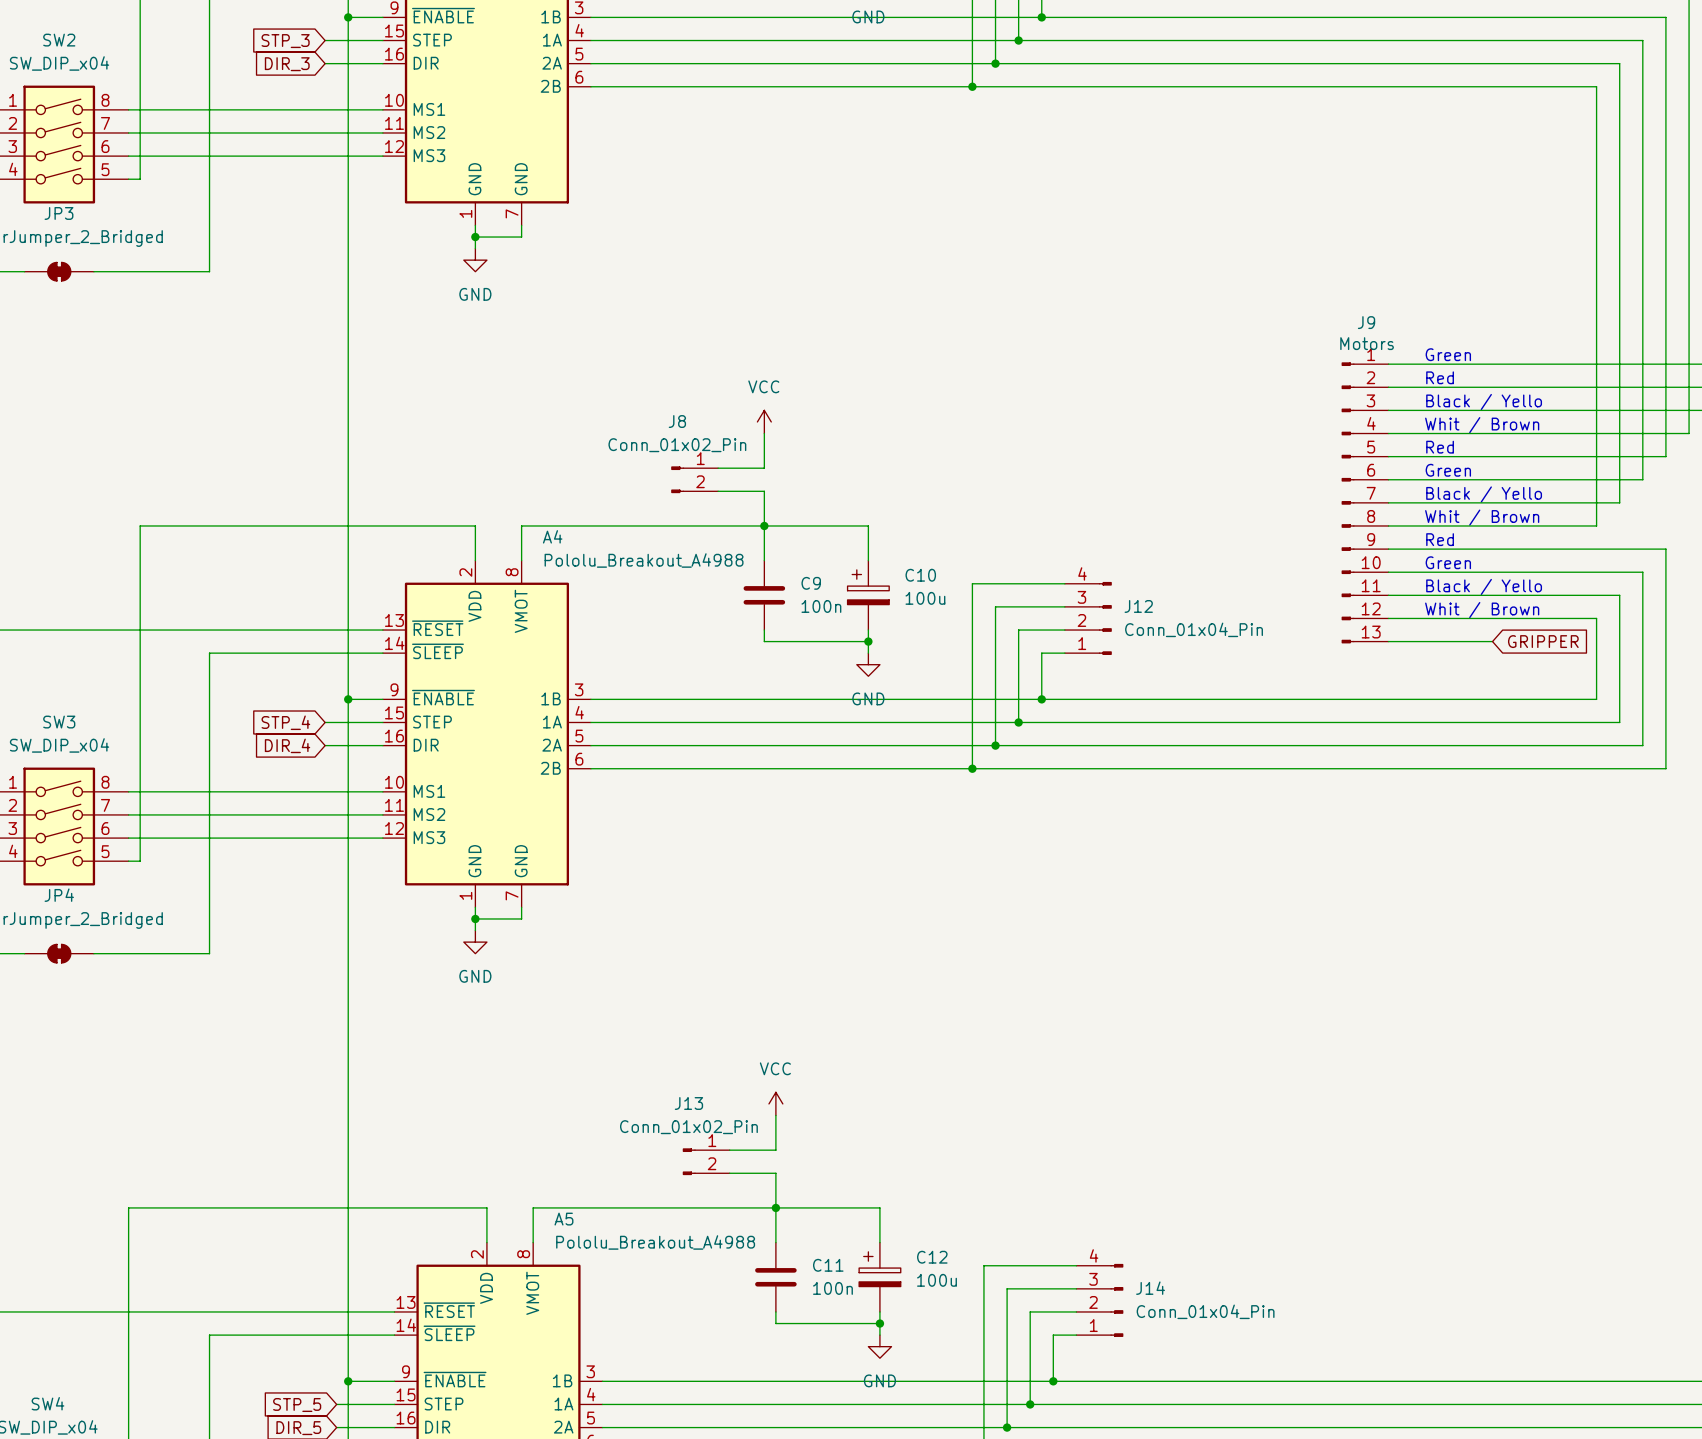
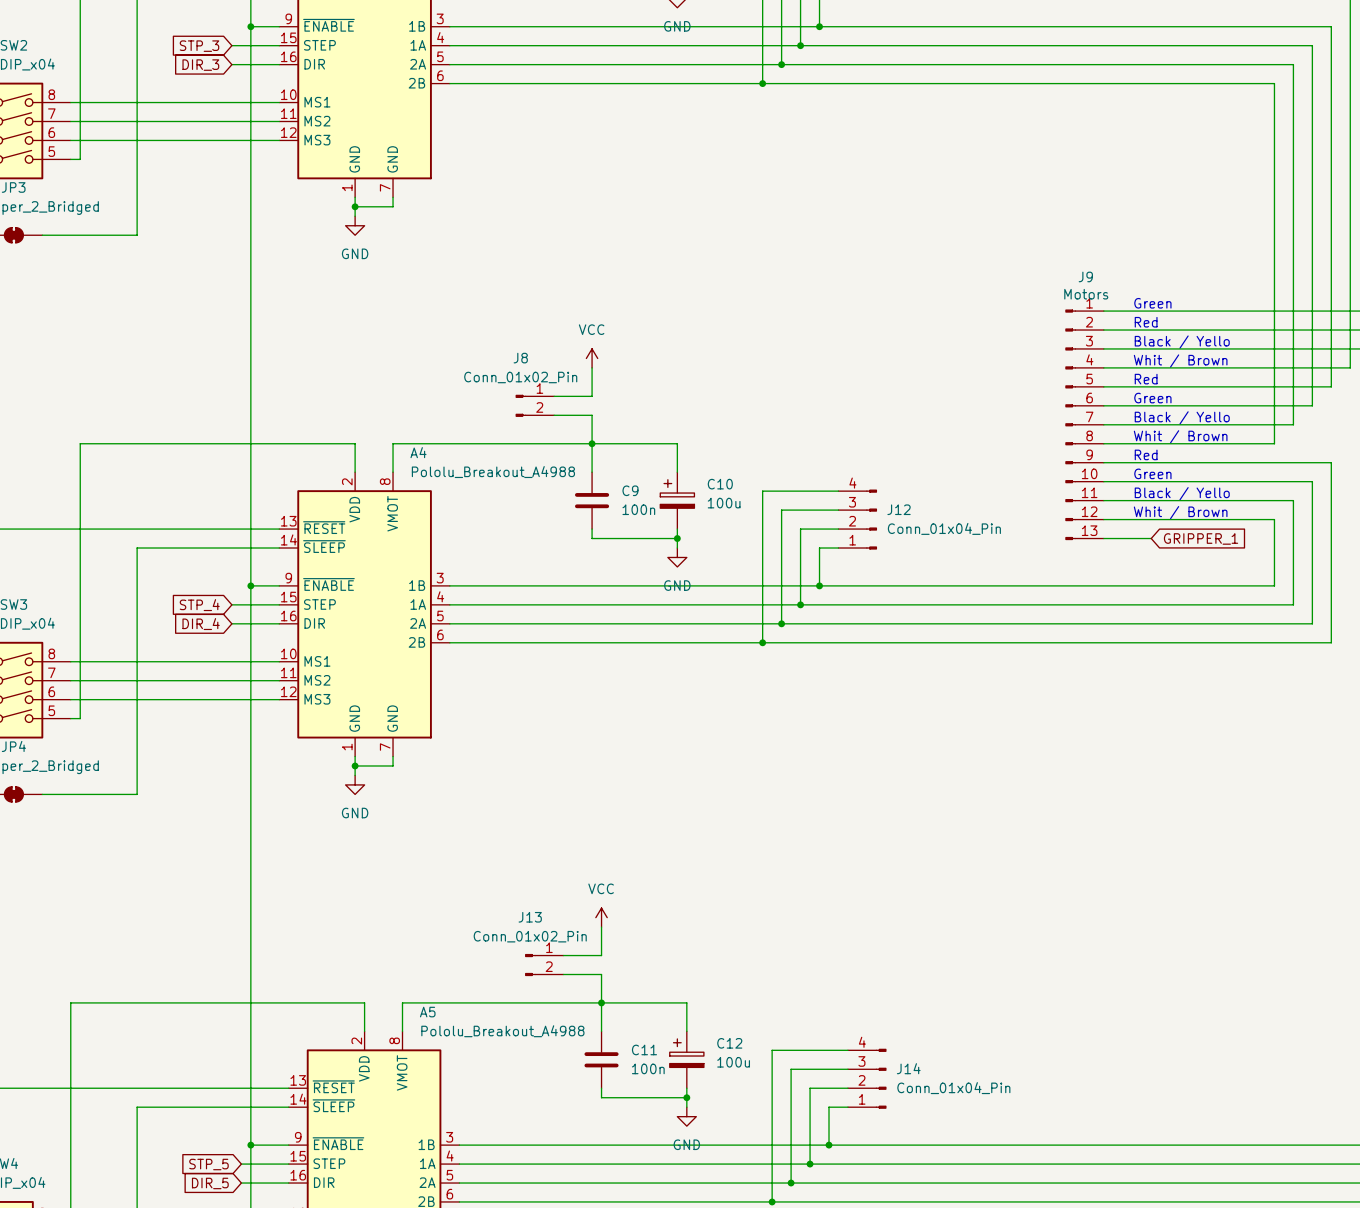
wire: (1446, 641) (1492, 641) -> none
global label: GRIPPER (1543, 641) -> GRIPPER_1 (1201, 538)

